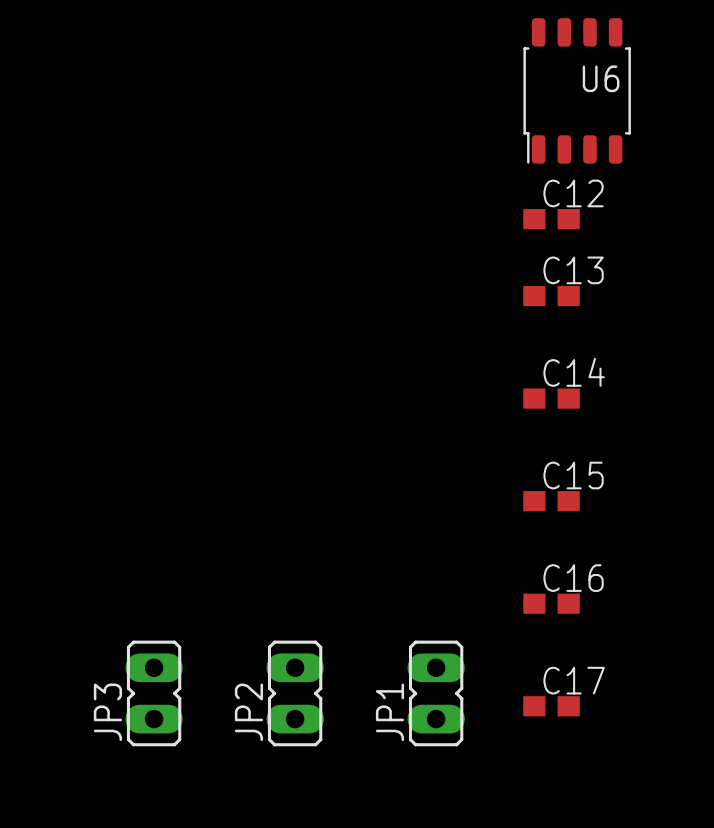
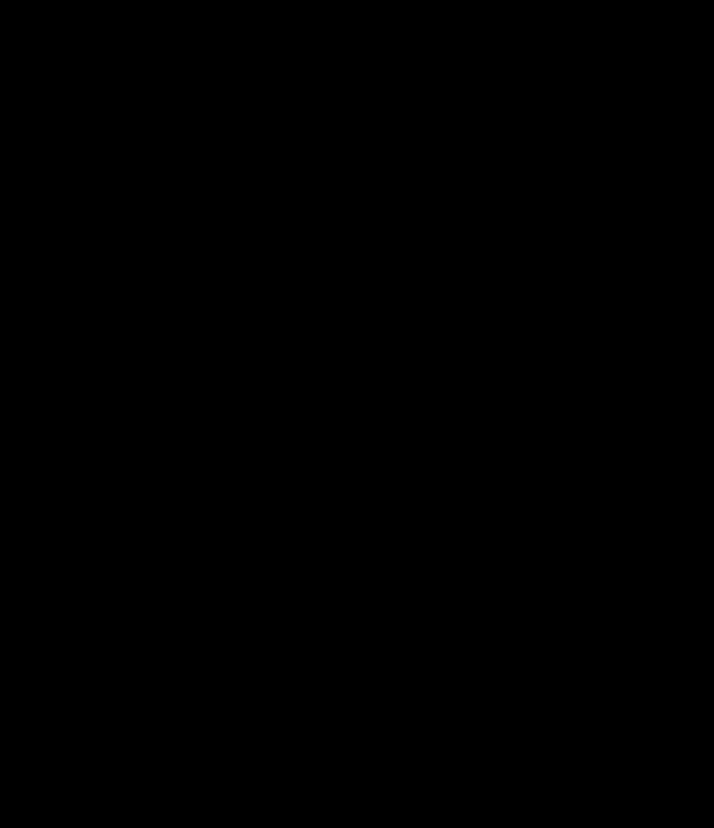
U6: (577, 90) -> none
C12: (551, 219) -> none
C13: (551, 296) -> none
C14: (551, 398) -> none
C15: (551, 501) -> none
C16: (551, 603) -> none
JP3: (154, 693) -> none
JP2: (295, 693) -> none
JP1: (436, 693) -> none
C17: (551, 706) -> none

